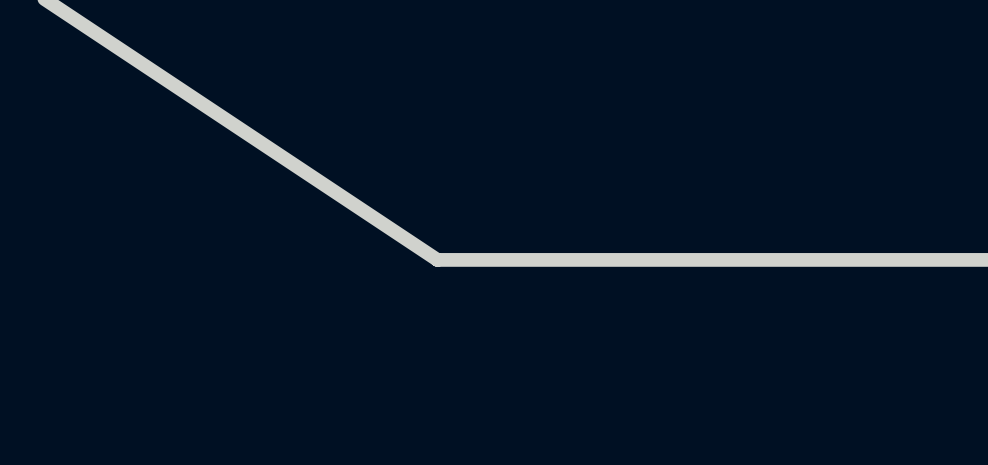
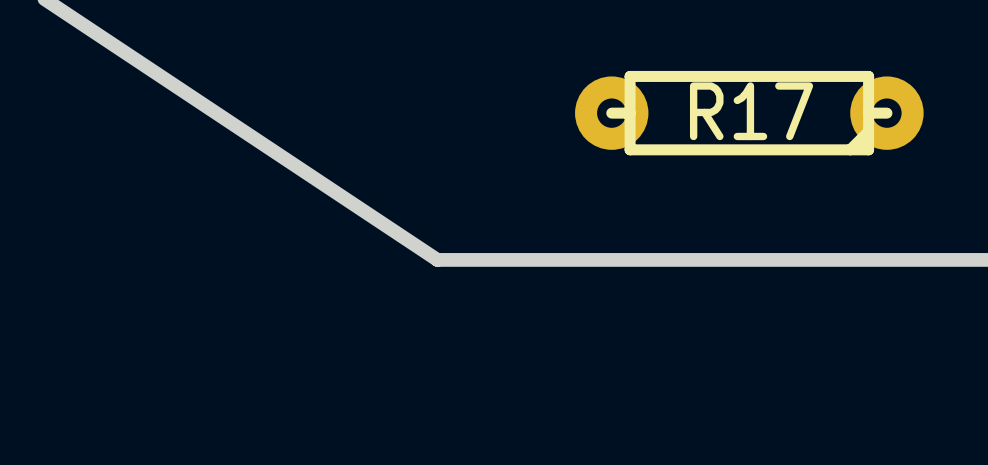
R17: none -> (749, 113)

